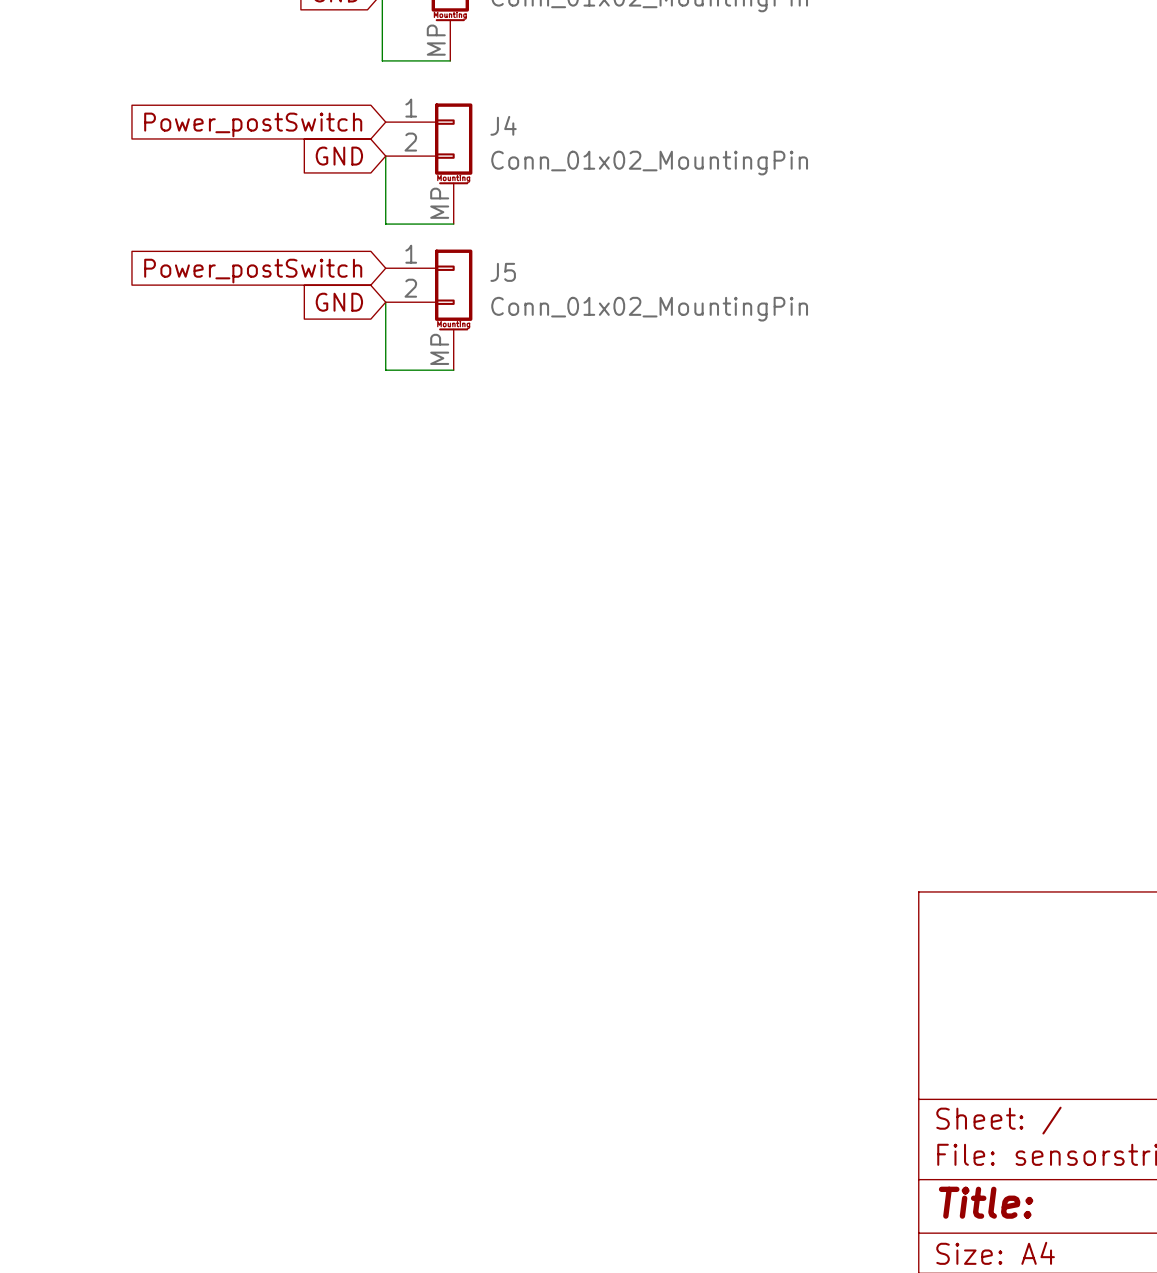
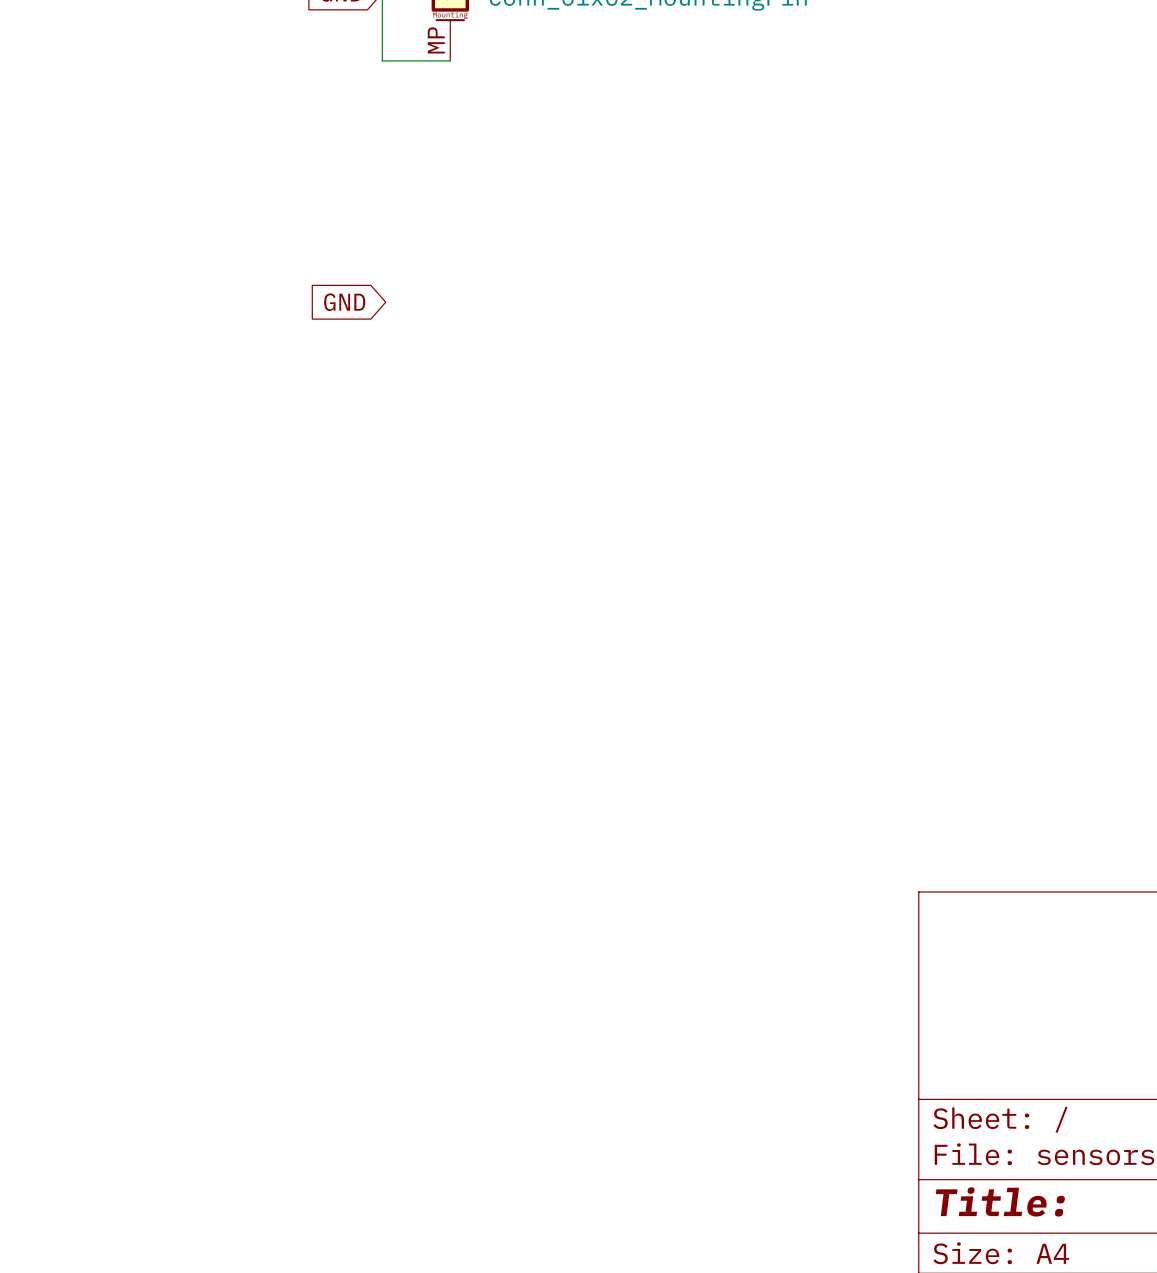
global label: Power_postSwitch (253, 124) -> none
global label: GND (339, 156) -> none
wire: (385, 156) (385, 224) (453, 224) -> none
J4: Conn_01x02_MountingPin (429, 163) -> none
global label: Power_postSwitch (253, 271) -> none
wire: (385, 302) (385, 370) (453, 370) -> none
J5: Conn_01x02_MountingPin (429, 309) -> none

